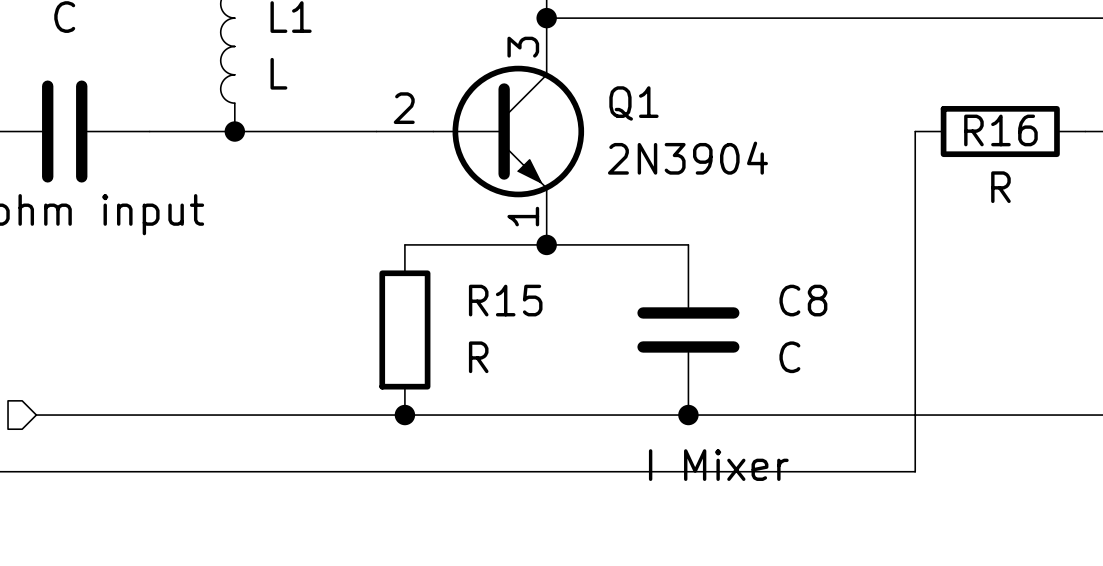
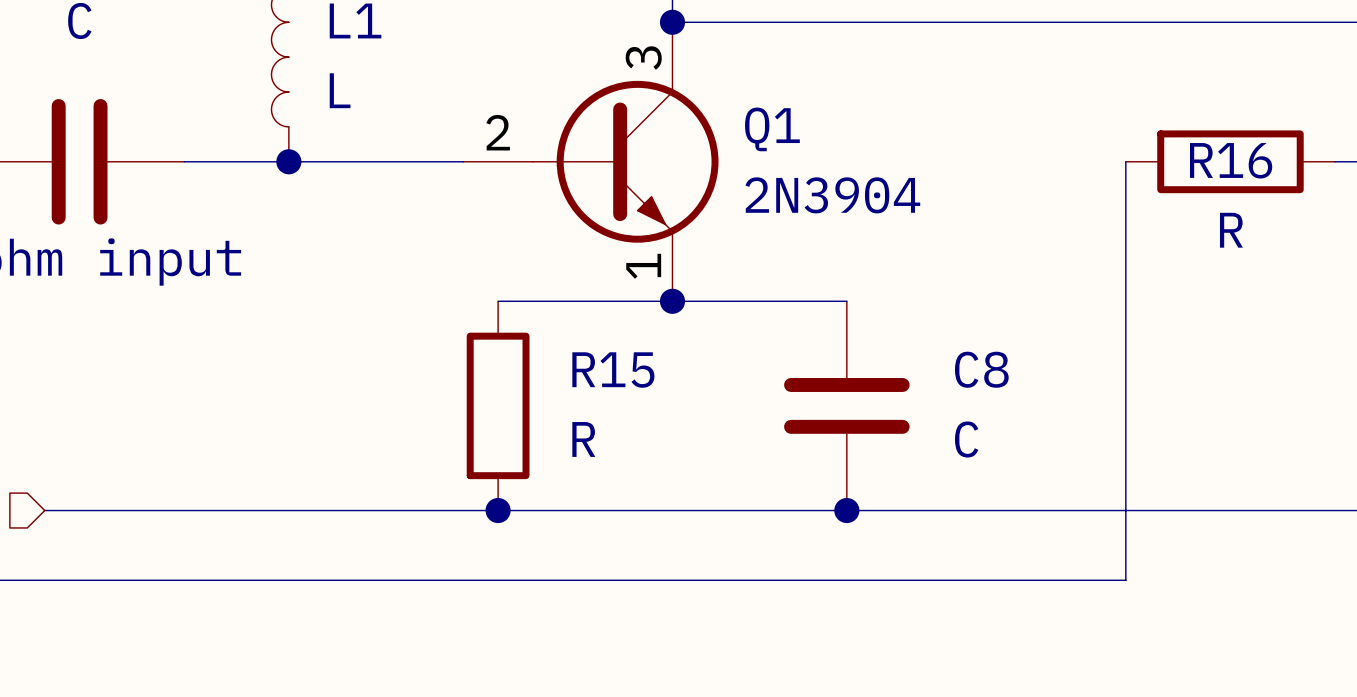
text: I Mixer (718, 465) -> none

